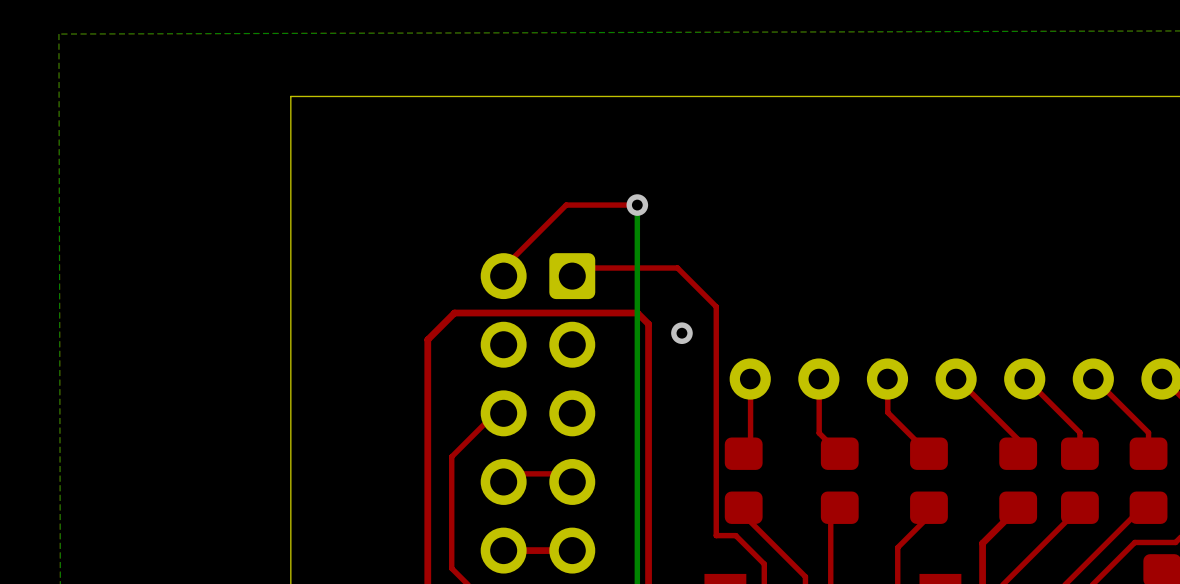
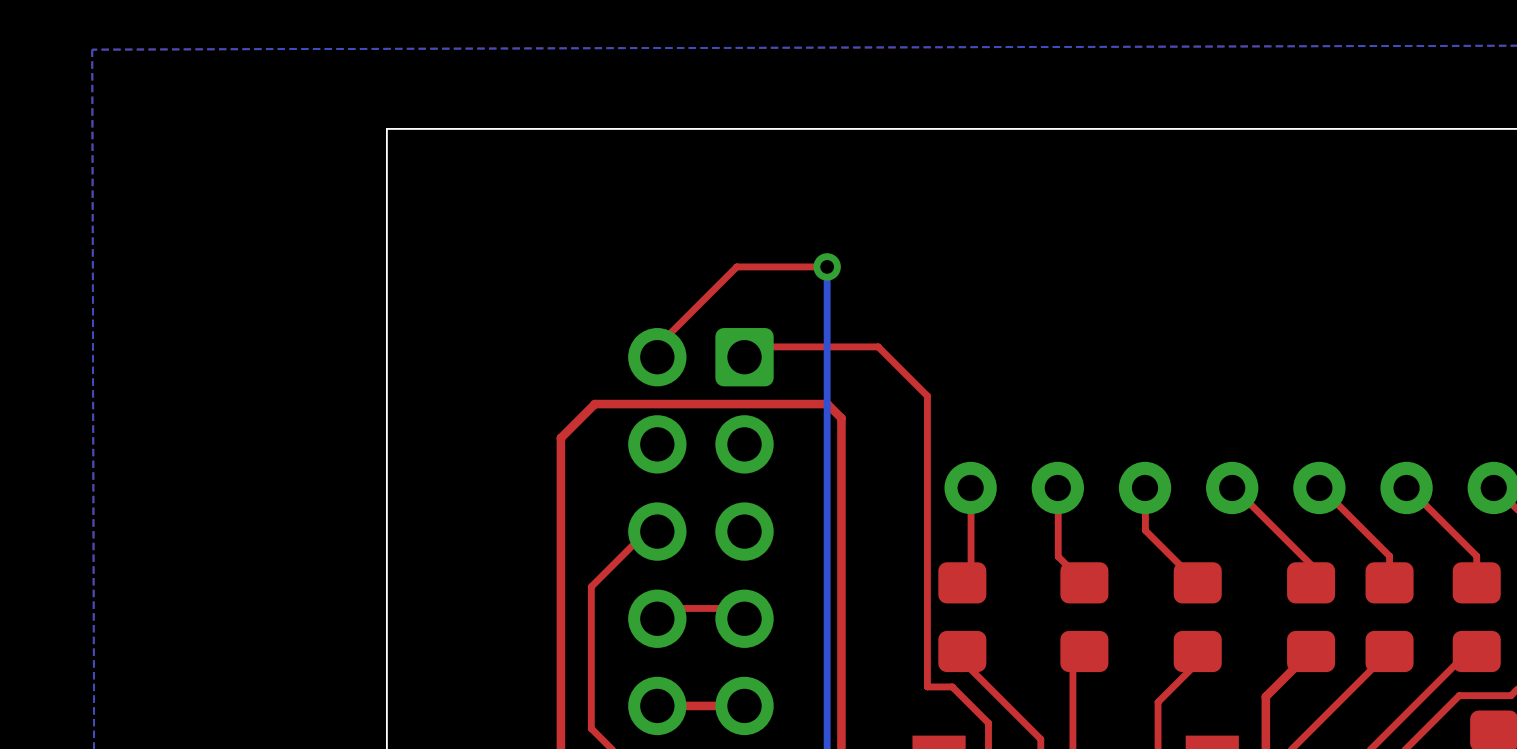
via: (681, 333) -> none

